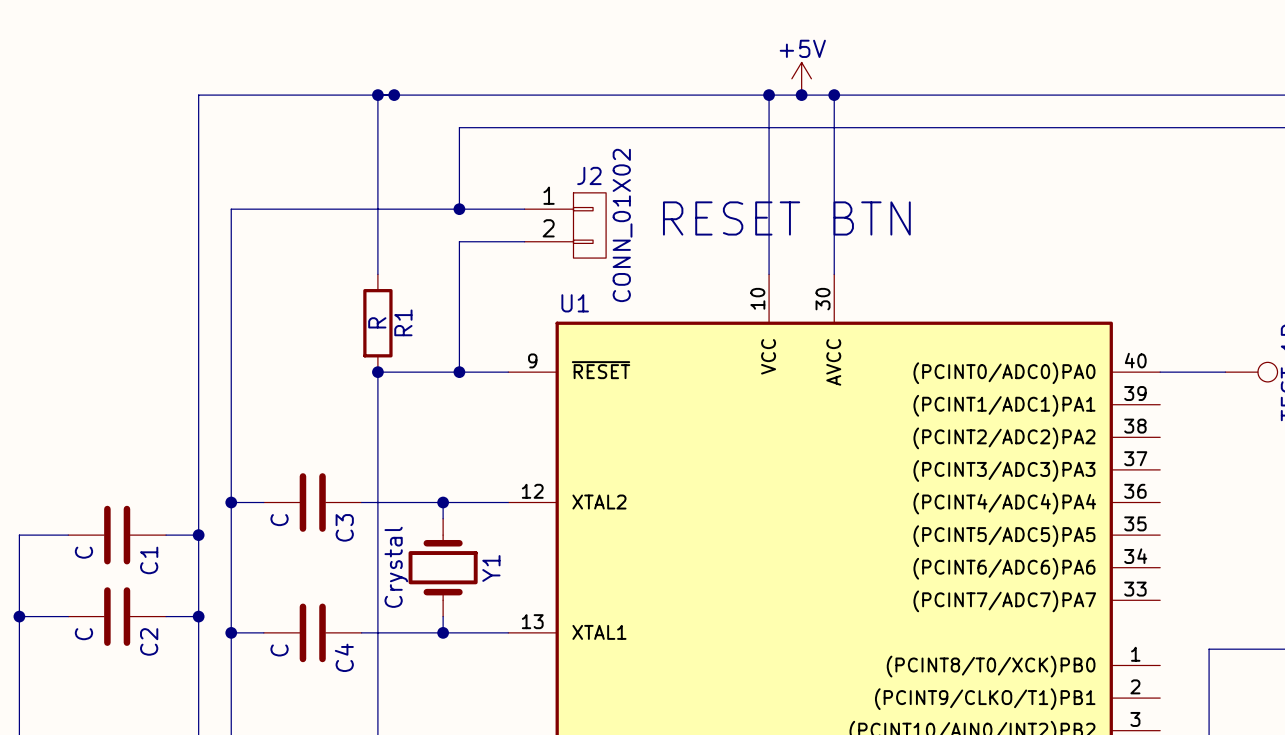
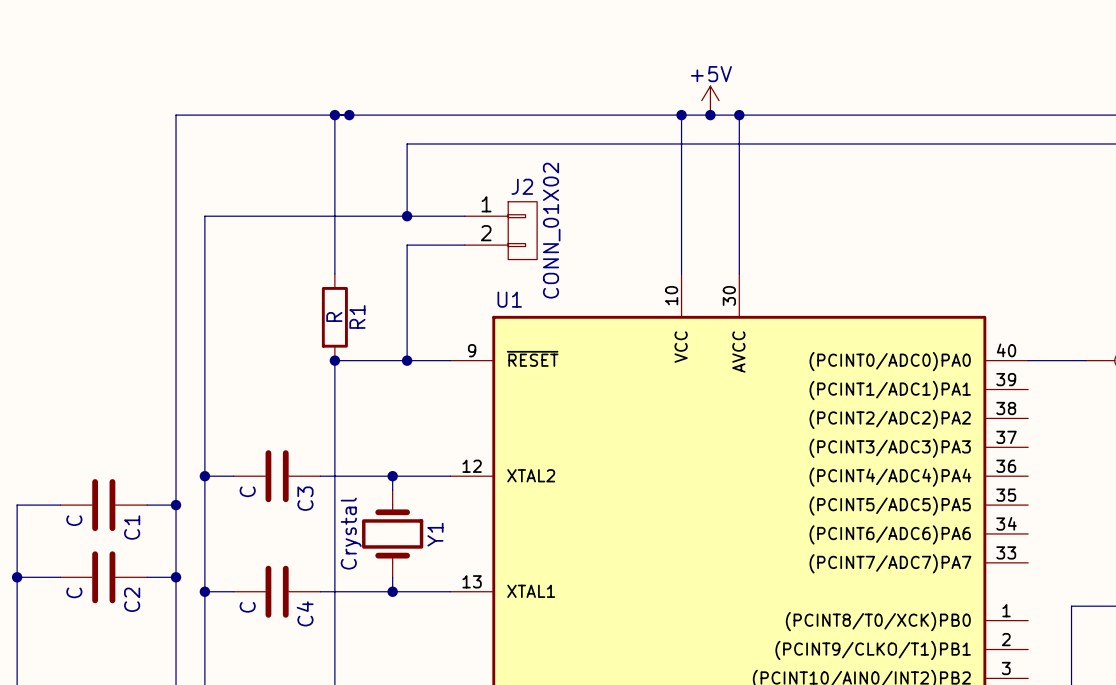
text: RESET BTN (786, 218) -> none

